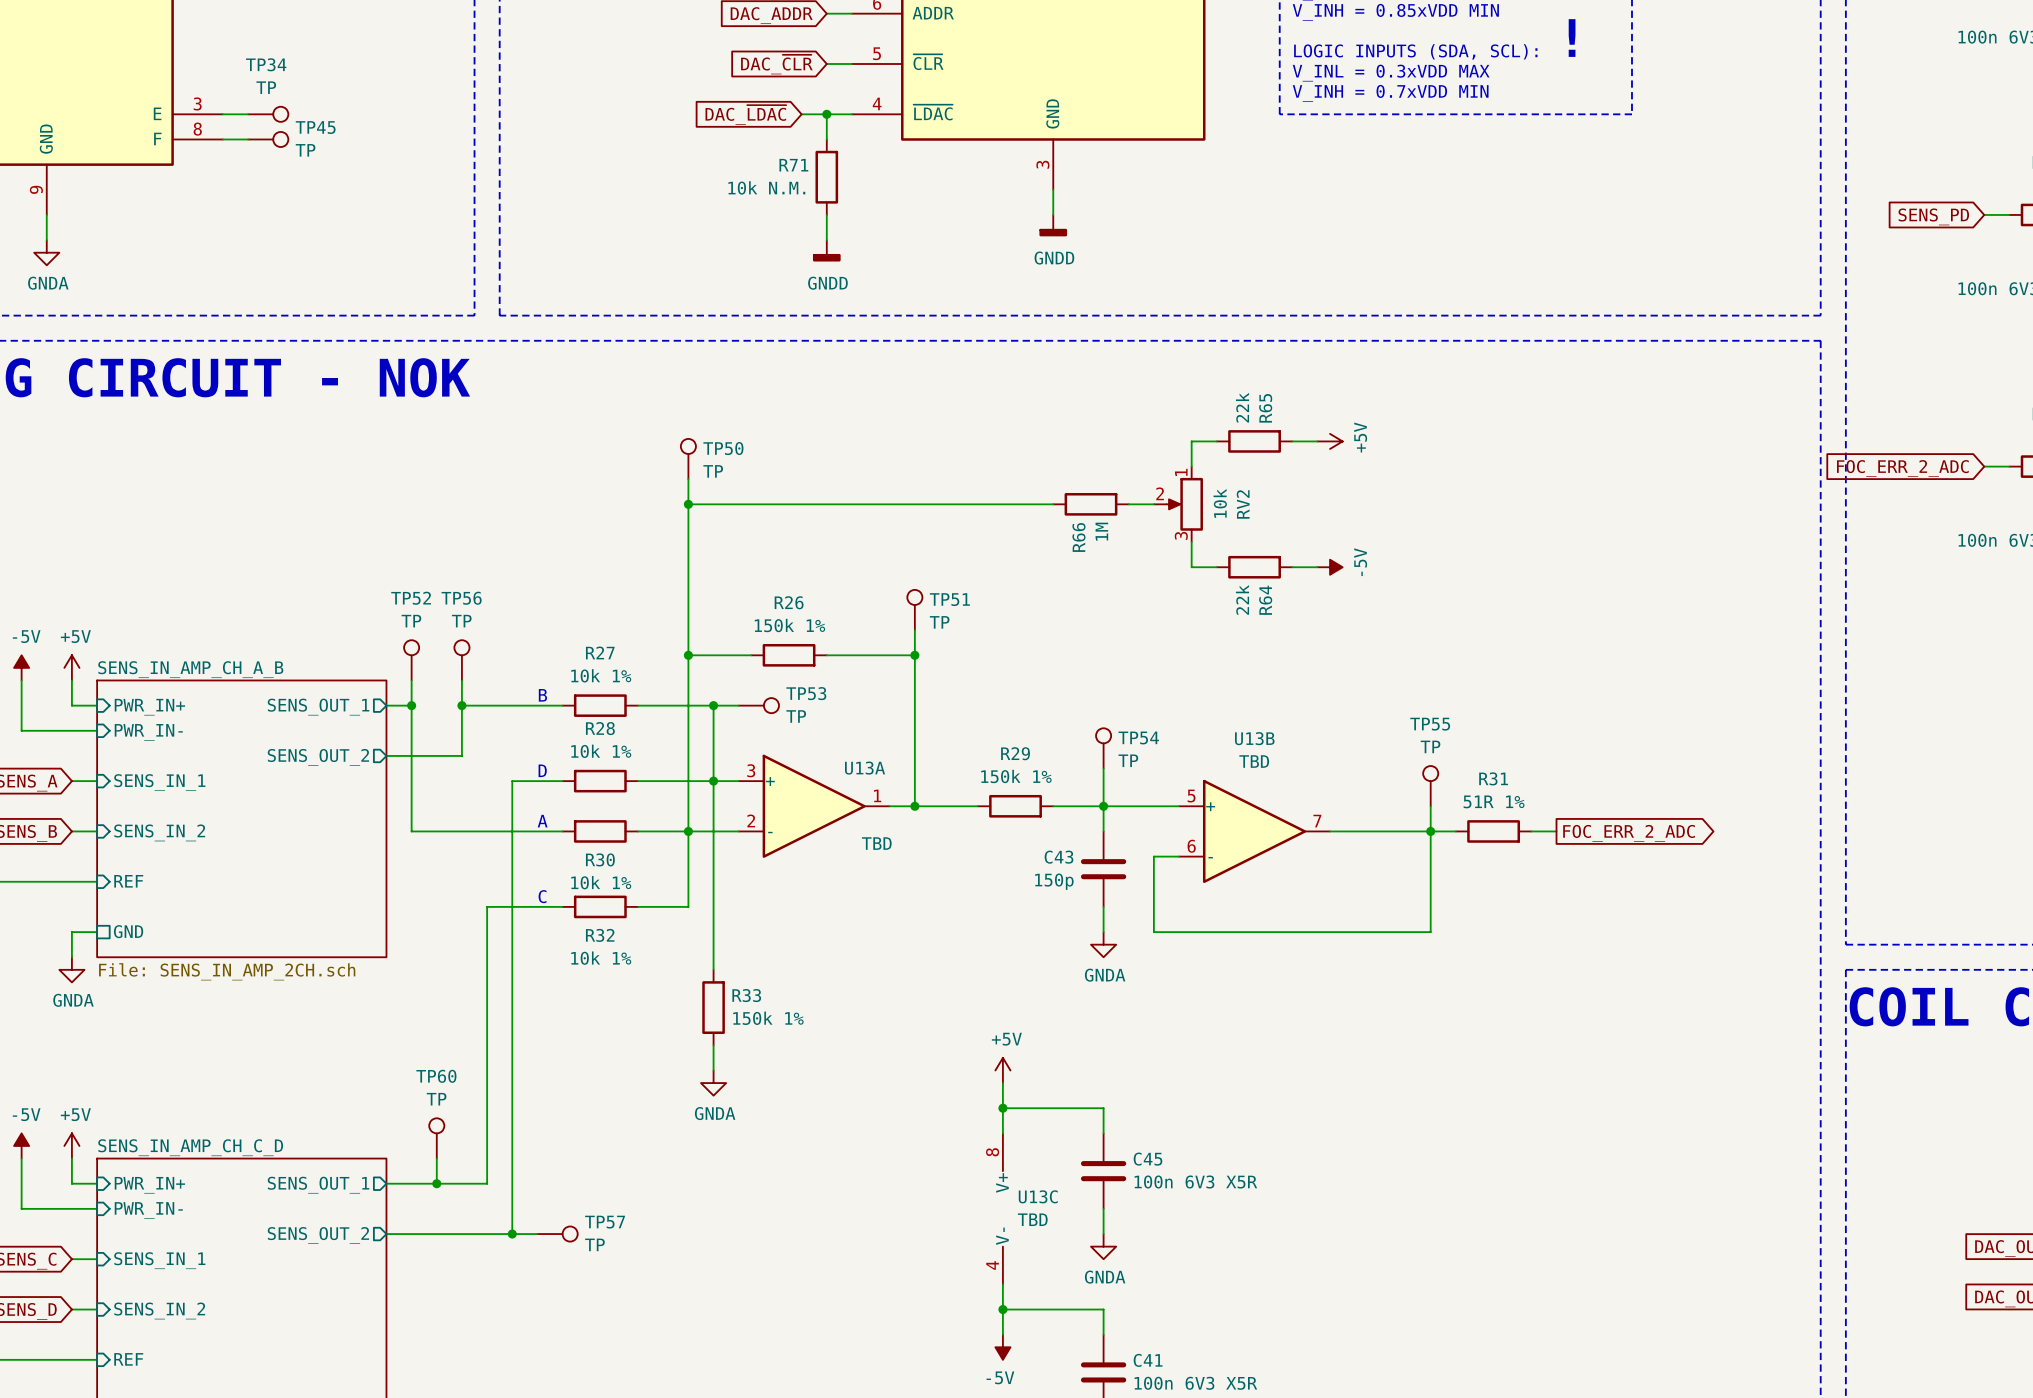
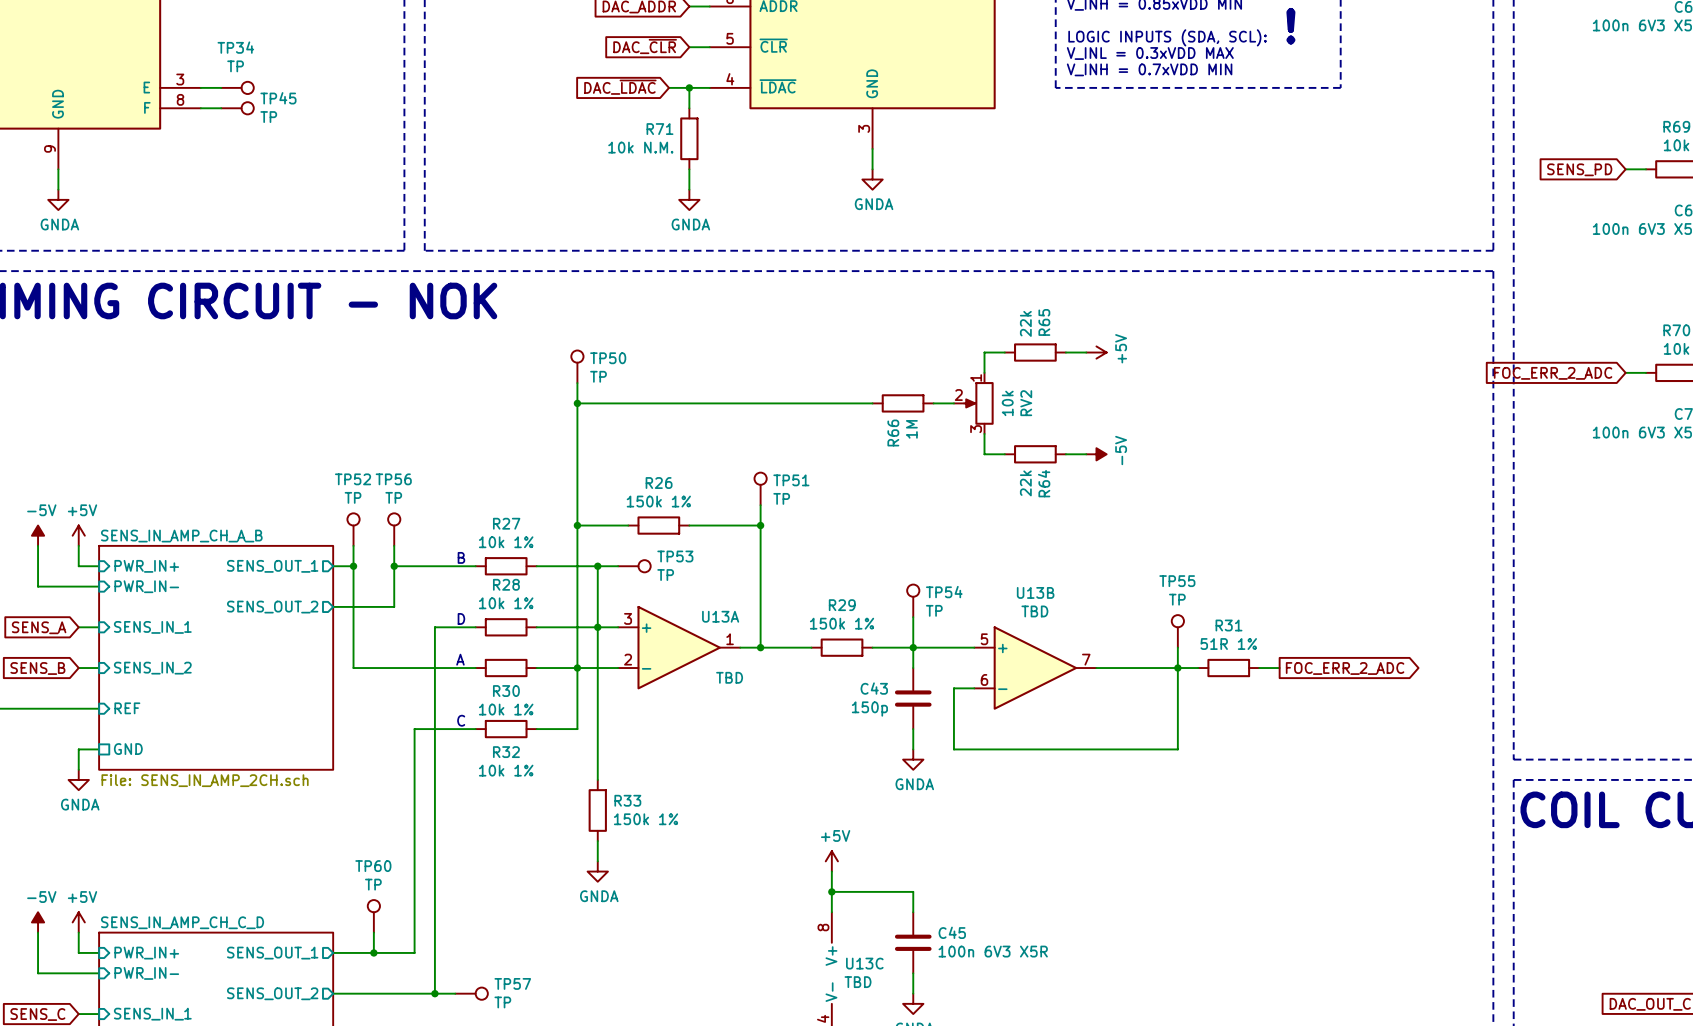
power symbol: GNDD (1053, 225) -> GNDA (872, 179)
power symbol: GNDD (826, 250) -> GNDA (689, 199)

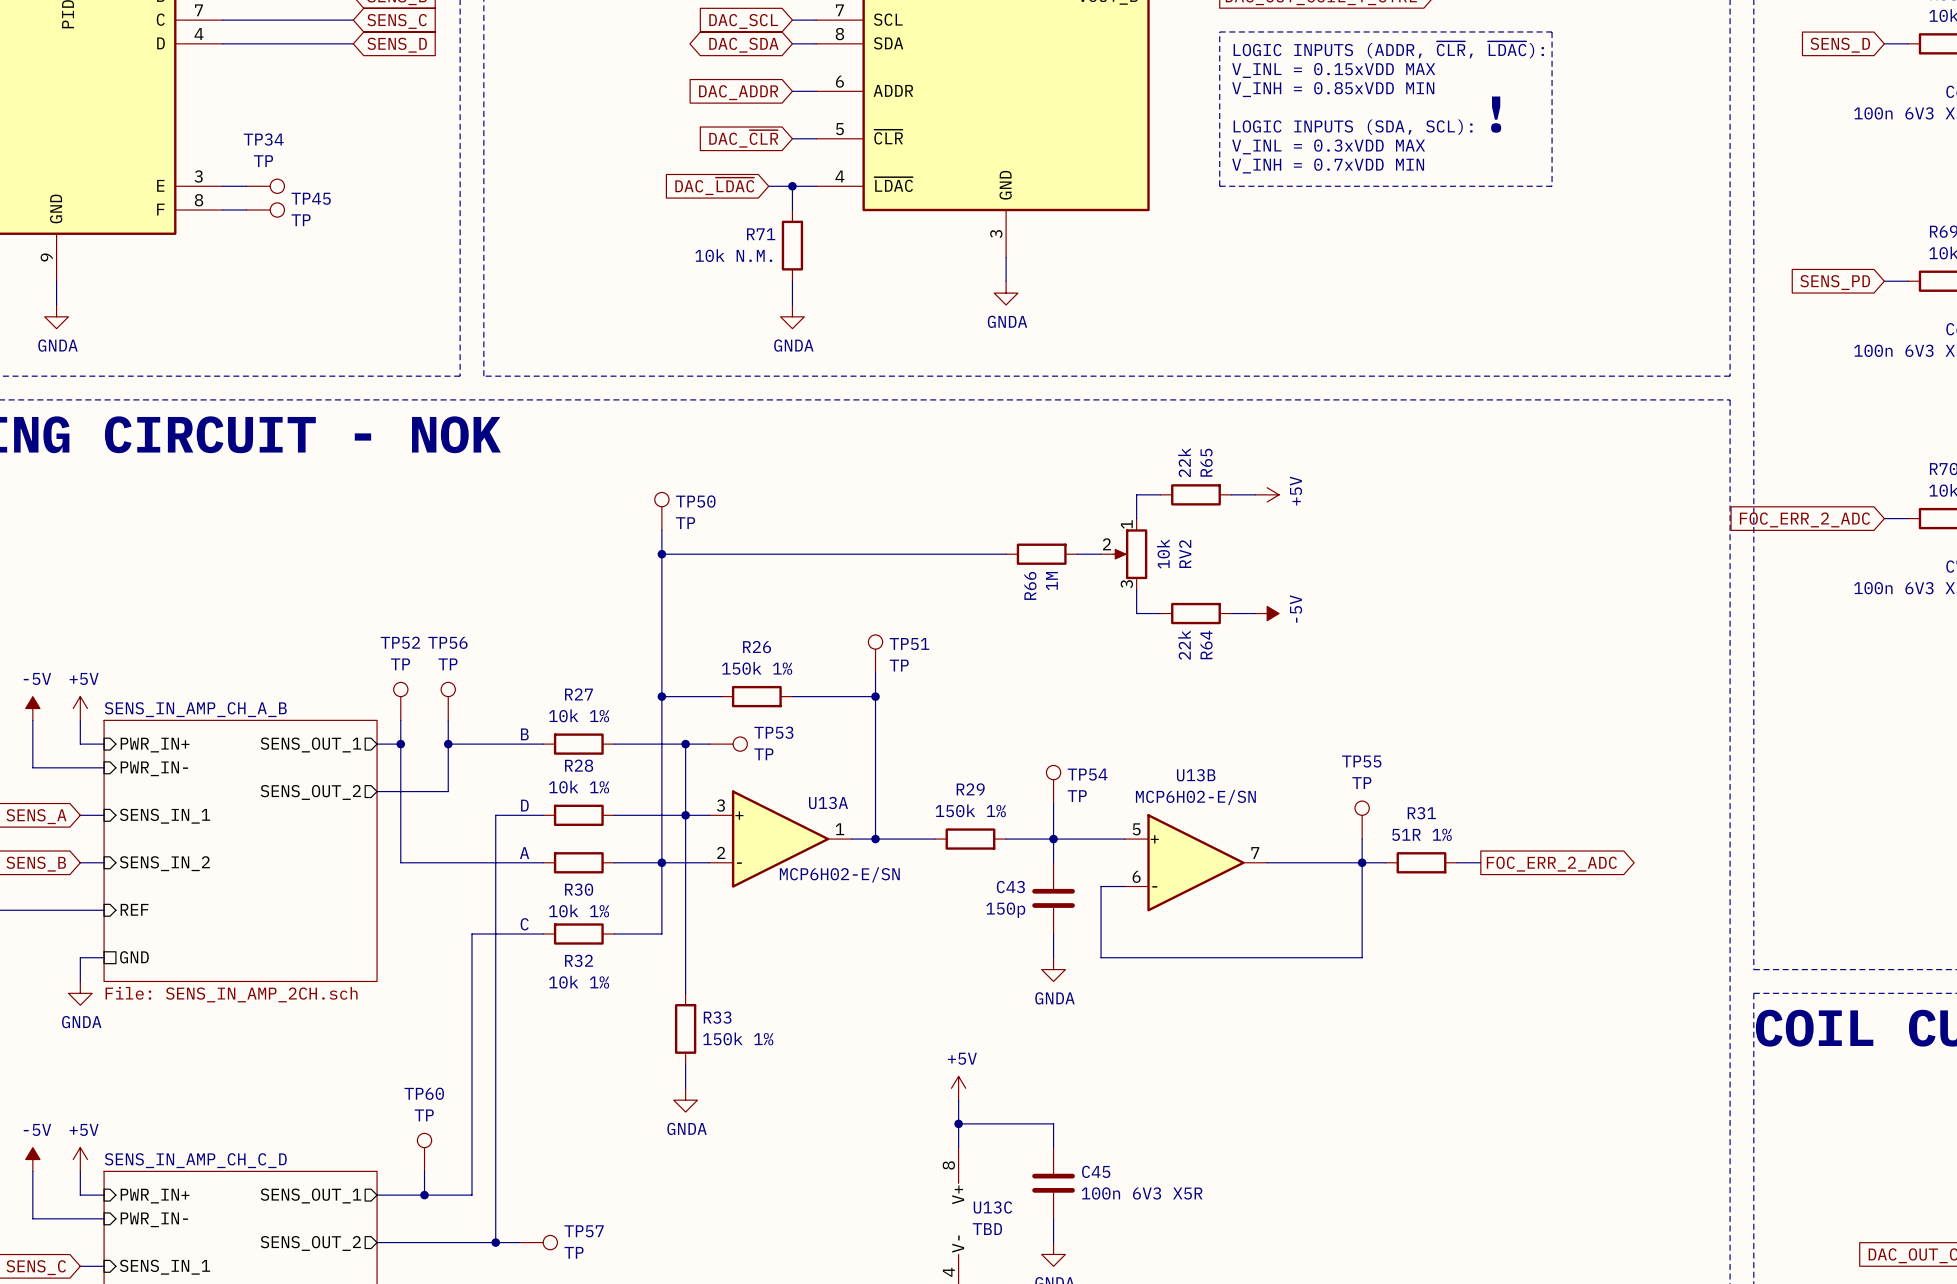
U13B value: TBD (1034, 611) -> MCP6H02-E/SN (1195, 797)
U13A value: TBD (729, 677) -> MCP6H02-E/SN (839, 874)

